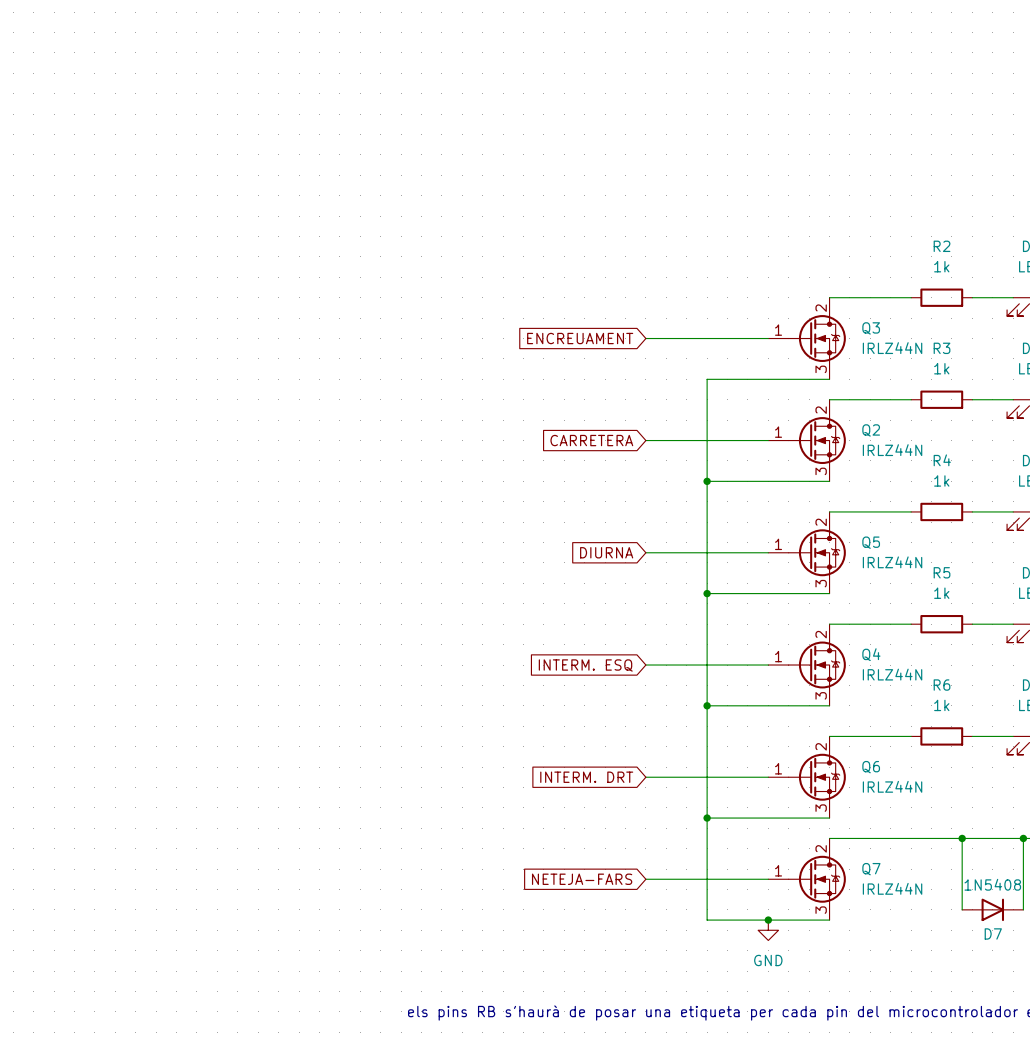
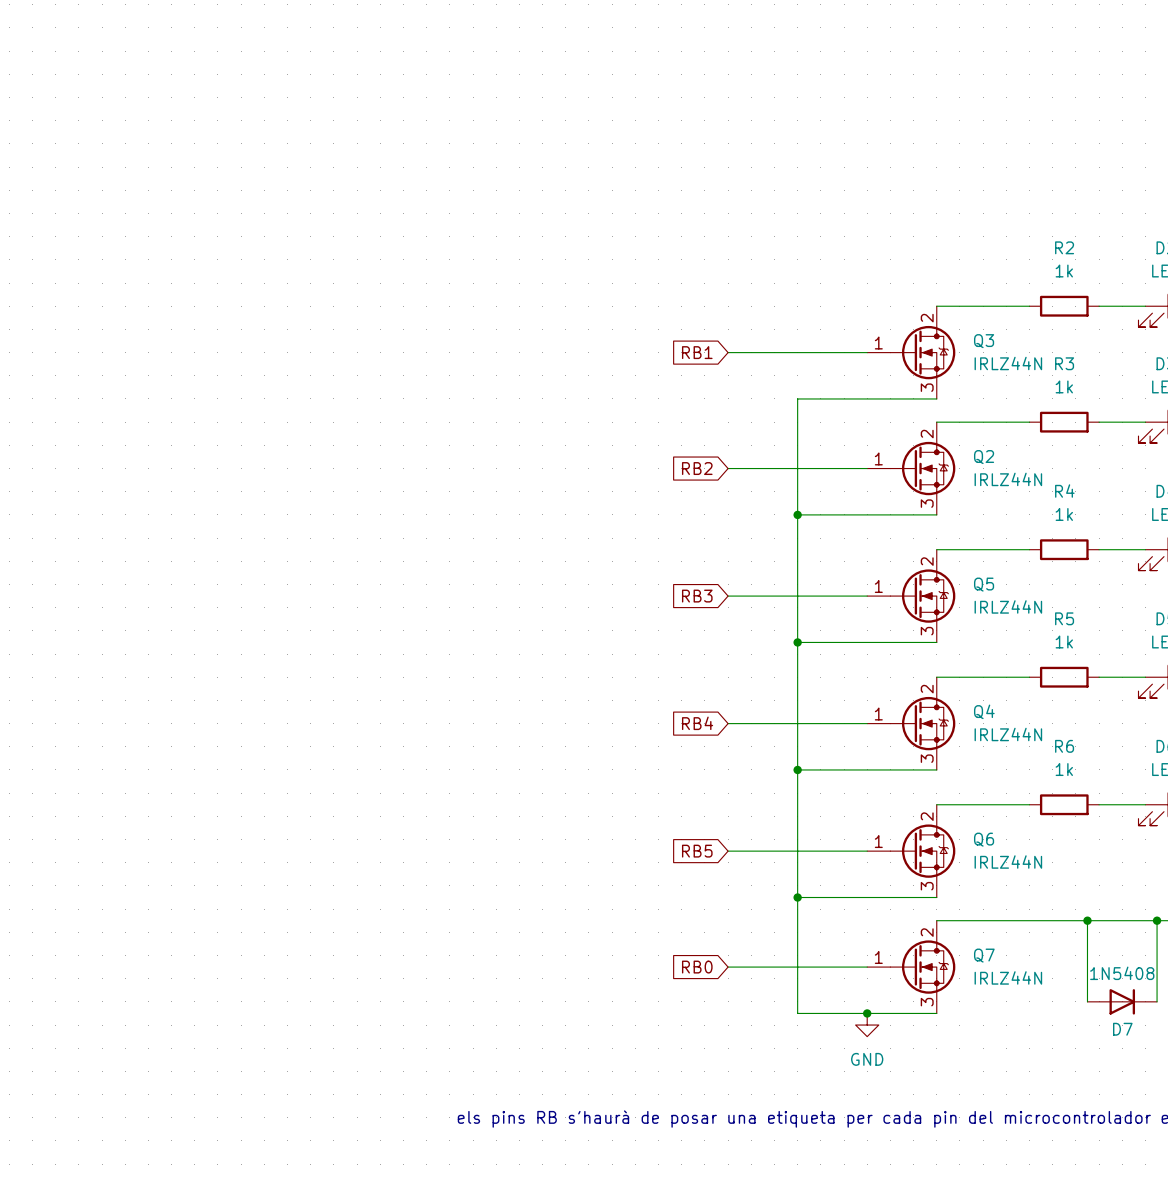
global label: ENCREUAMENT (580, 338) -> RB1 (697, 352)
global label: CARRETERA (591, 440) -> RB2 (697, 468)
global label: DIURNA (606, 552) -> RB3 (697, 596)
global label: INTERM. ESQ (585, 665) -> RB4 (697, 723)
global label: INTERM. DRT (586, 777) -> RB5 (697, 851)
global label: NETEJA-FARS (582, 879) -> RB0 (697, 967)

